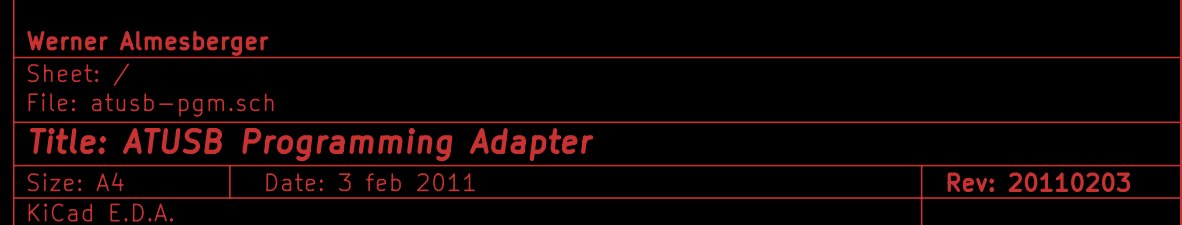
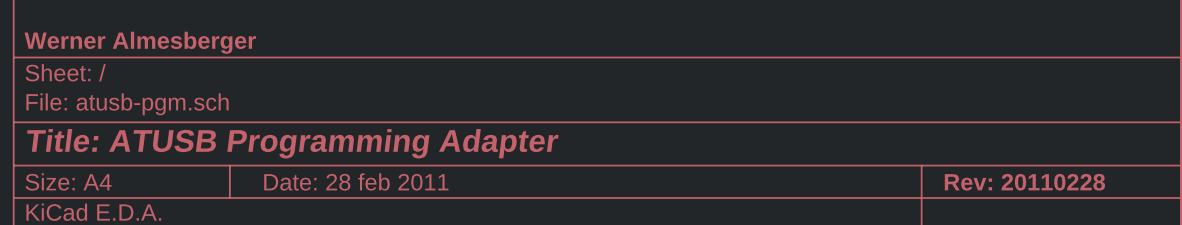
title block: Date: 3 feb 2011 (370, 182) -> Date: 28 feb 2011 (356, 181)
title block: Rev: 20110203 (1038, 182) -> Rev: 20110228 (1024, 182)

